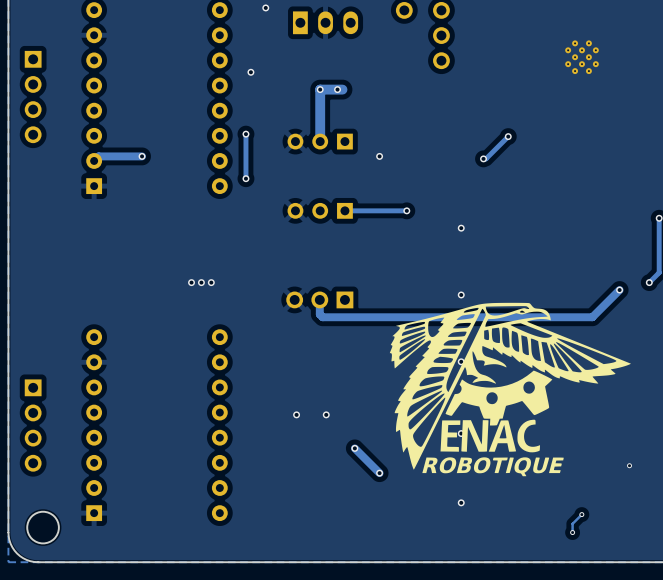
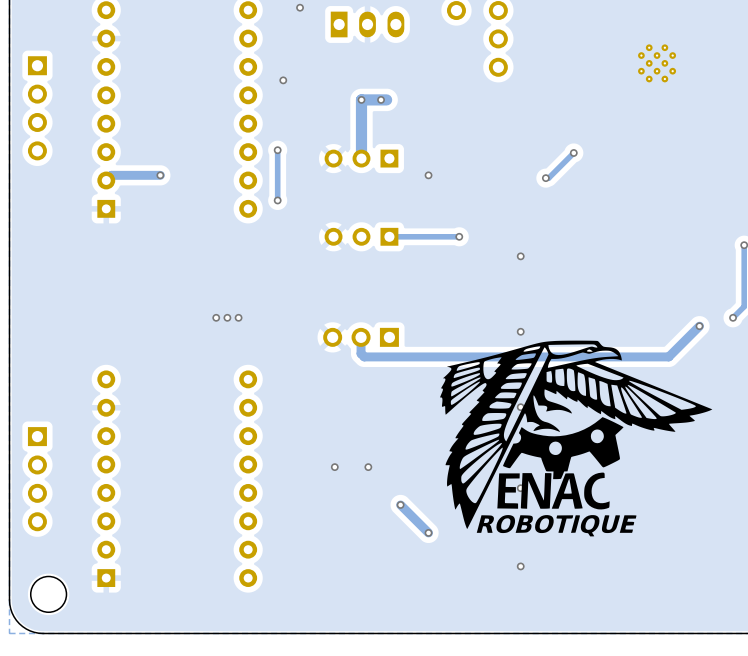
via: (629, 465) -> none
track: (581, 514) (572, 523) (572, 532) -> none
via: (581, 514) -> none
via: (572, 532) -> none

